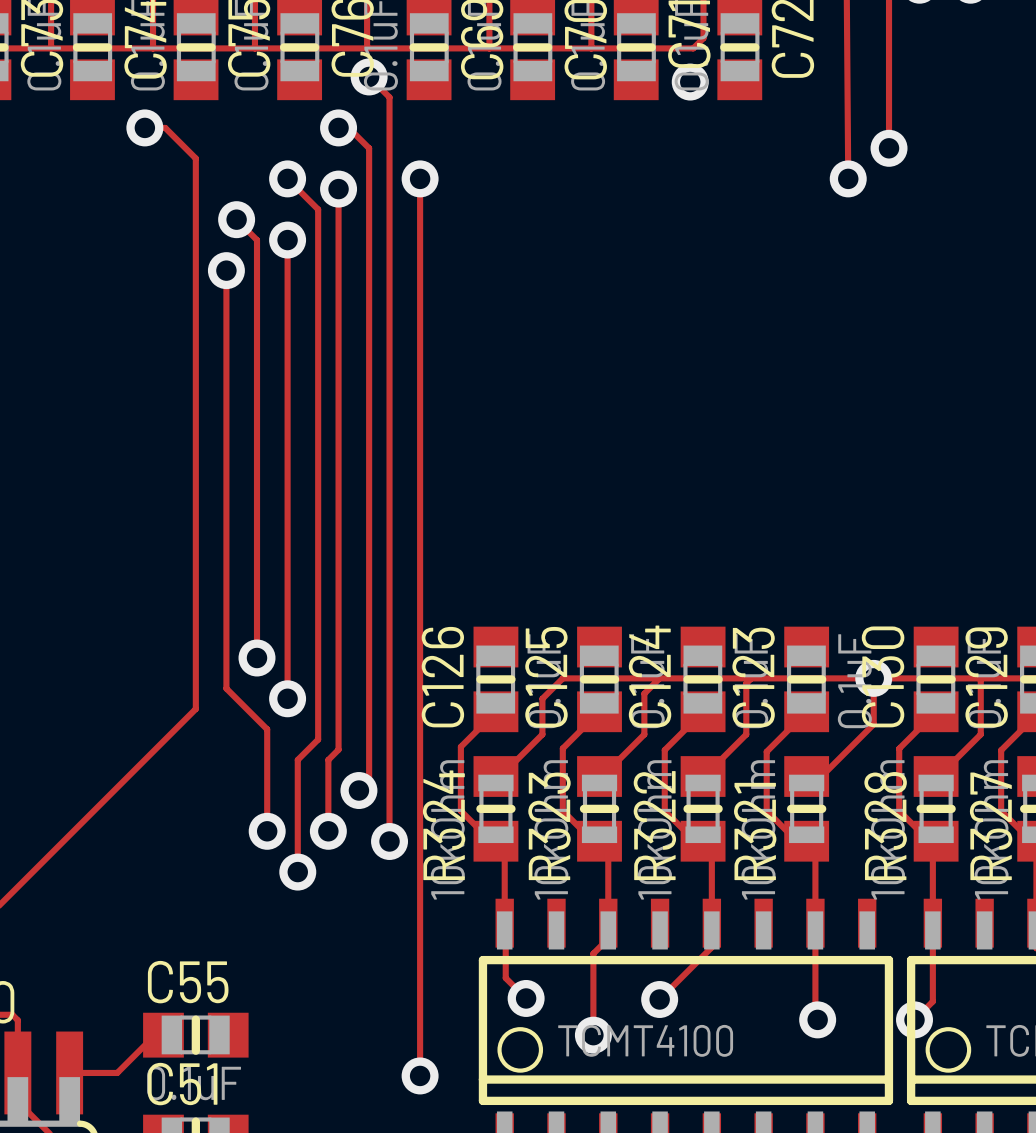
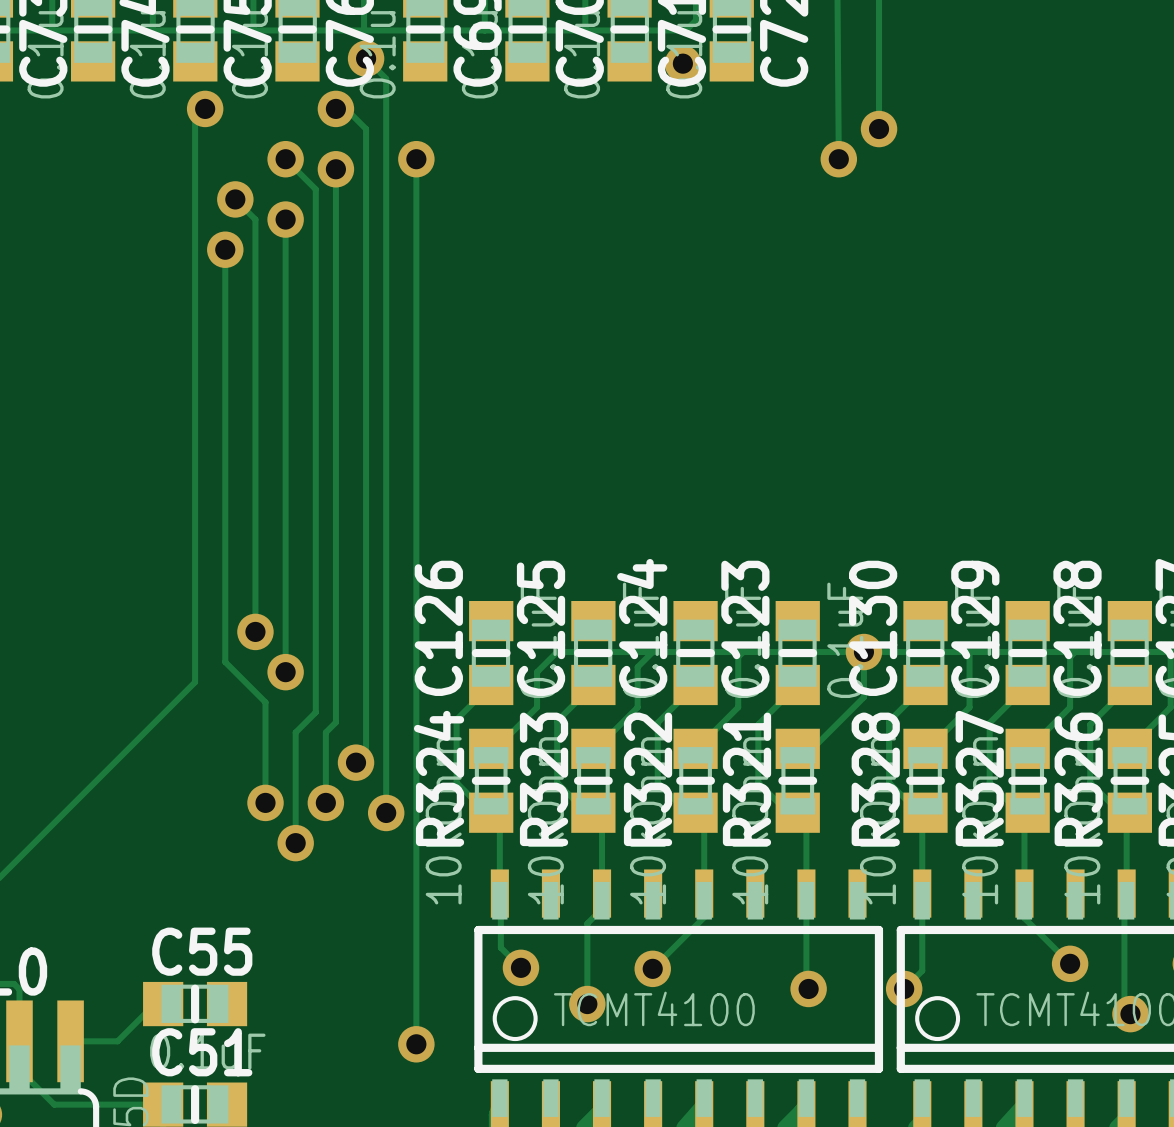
track: (144, 127) (165, 127) (195, 158) -> (195, 118) (195, 139)
via position: (144, 127) -> (205, 108)

